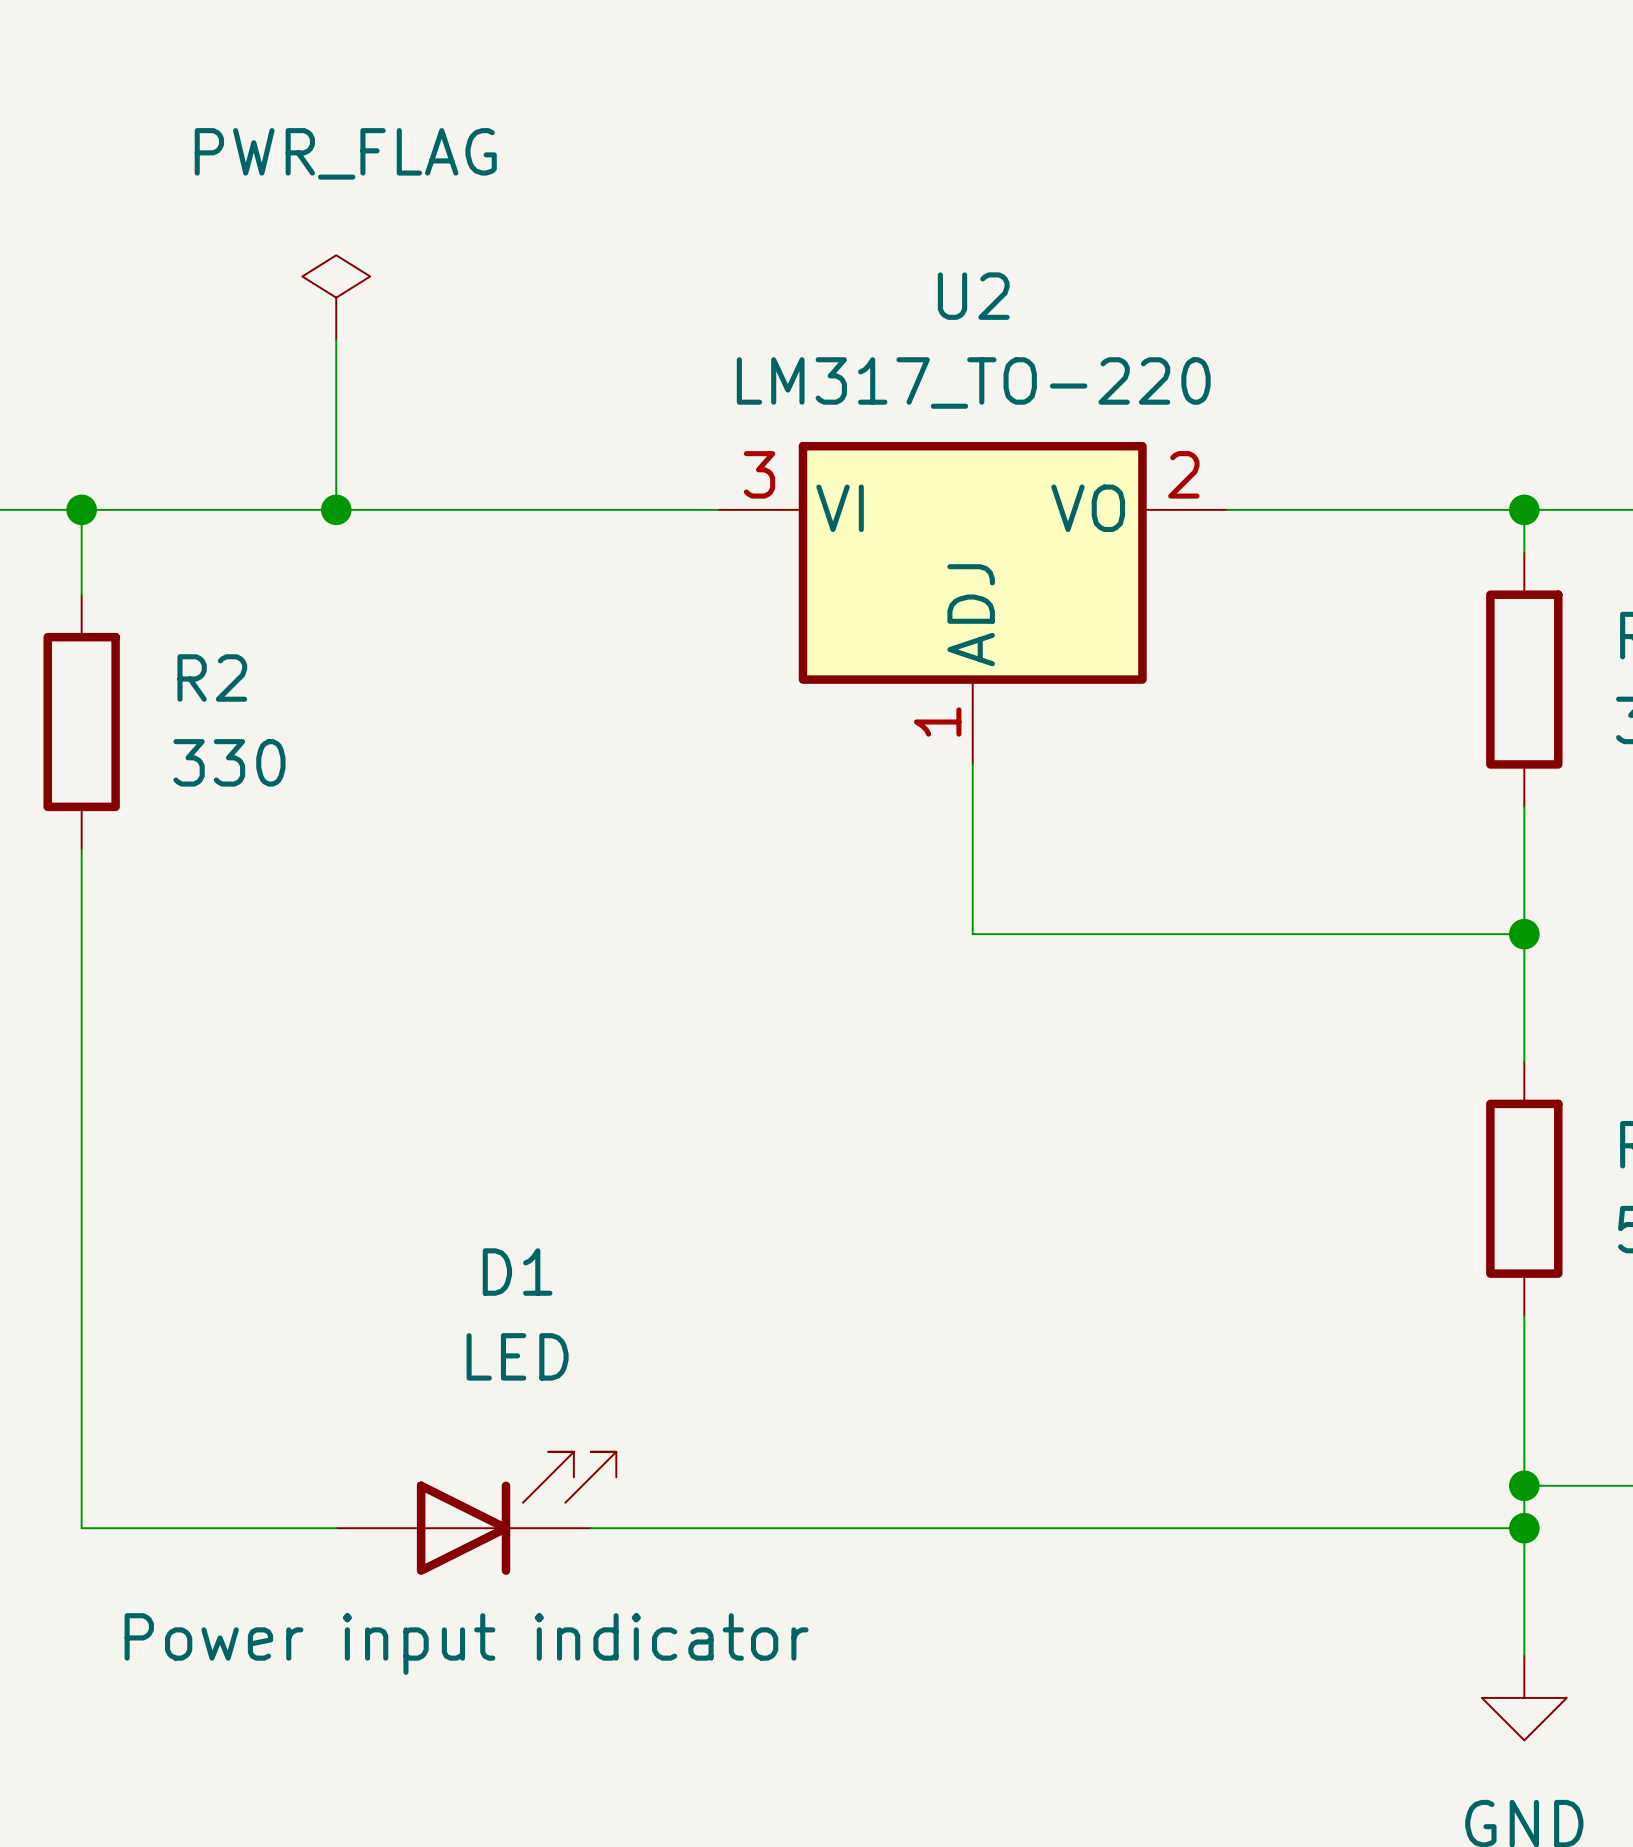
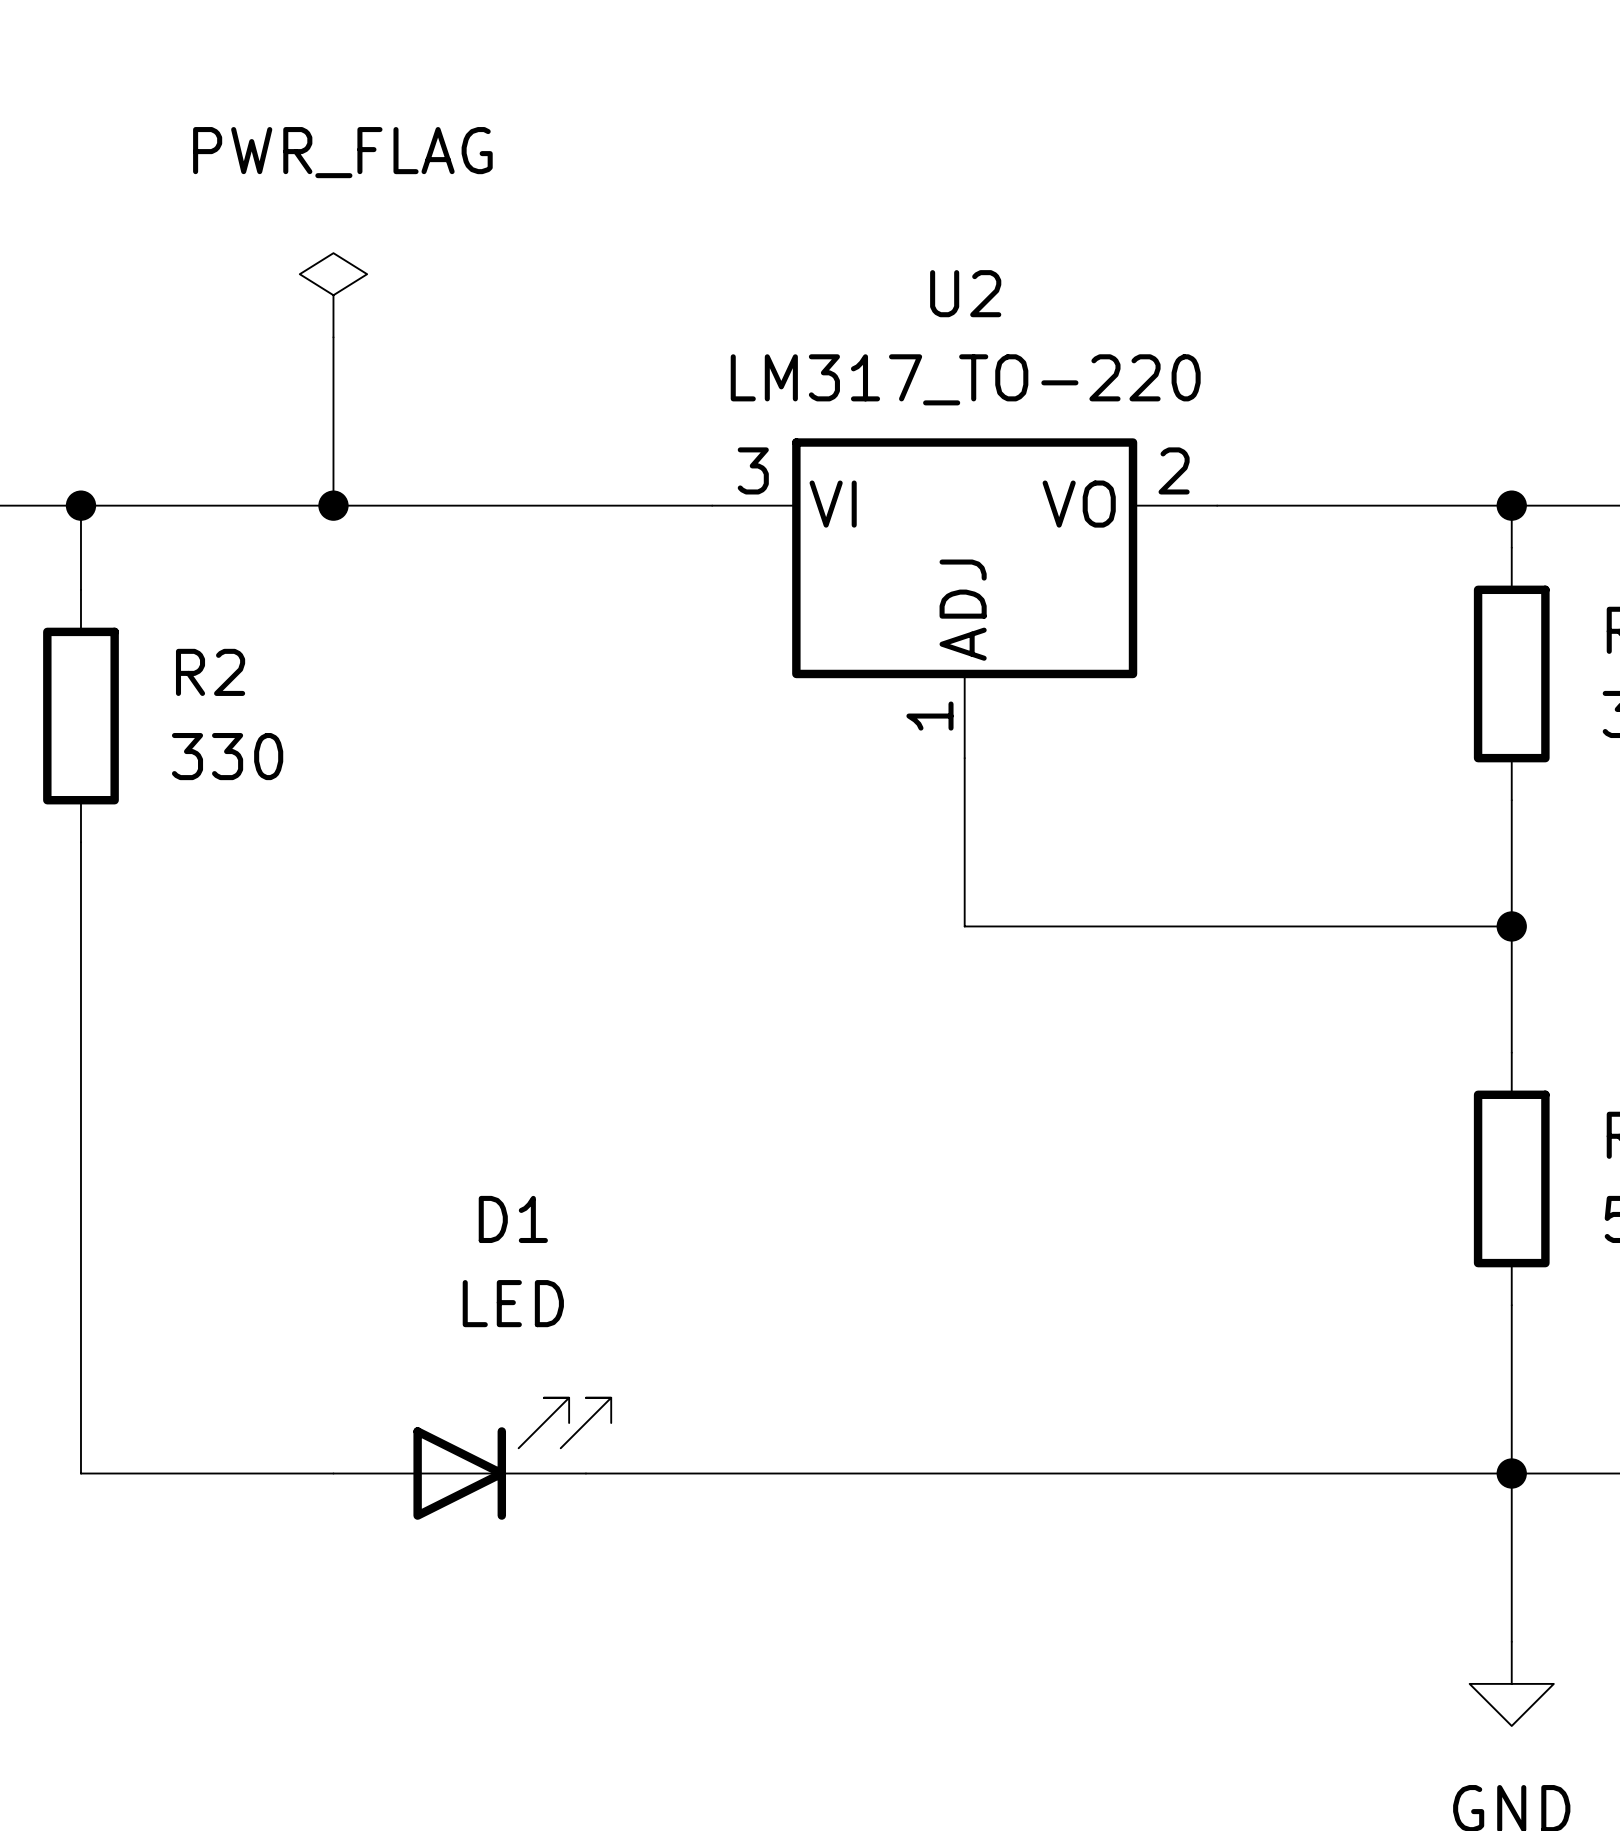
wire: (81, 1485) (81, 1528) (336, 1528) -> (80, 1473) (333, 1473)
D1 position: (476, 1513) -> (472, 1458)
wire: (590, 1528) (1524, 1528) -> (585, 1473) (1511, 1473)
junction: (1524, 1528) -> none
D1 text: Power input indicator (466, 1644) -> none

